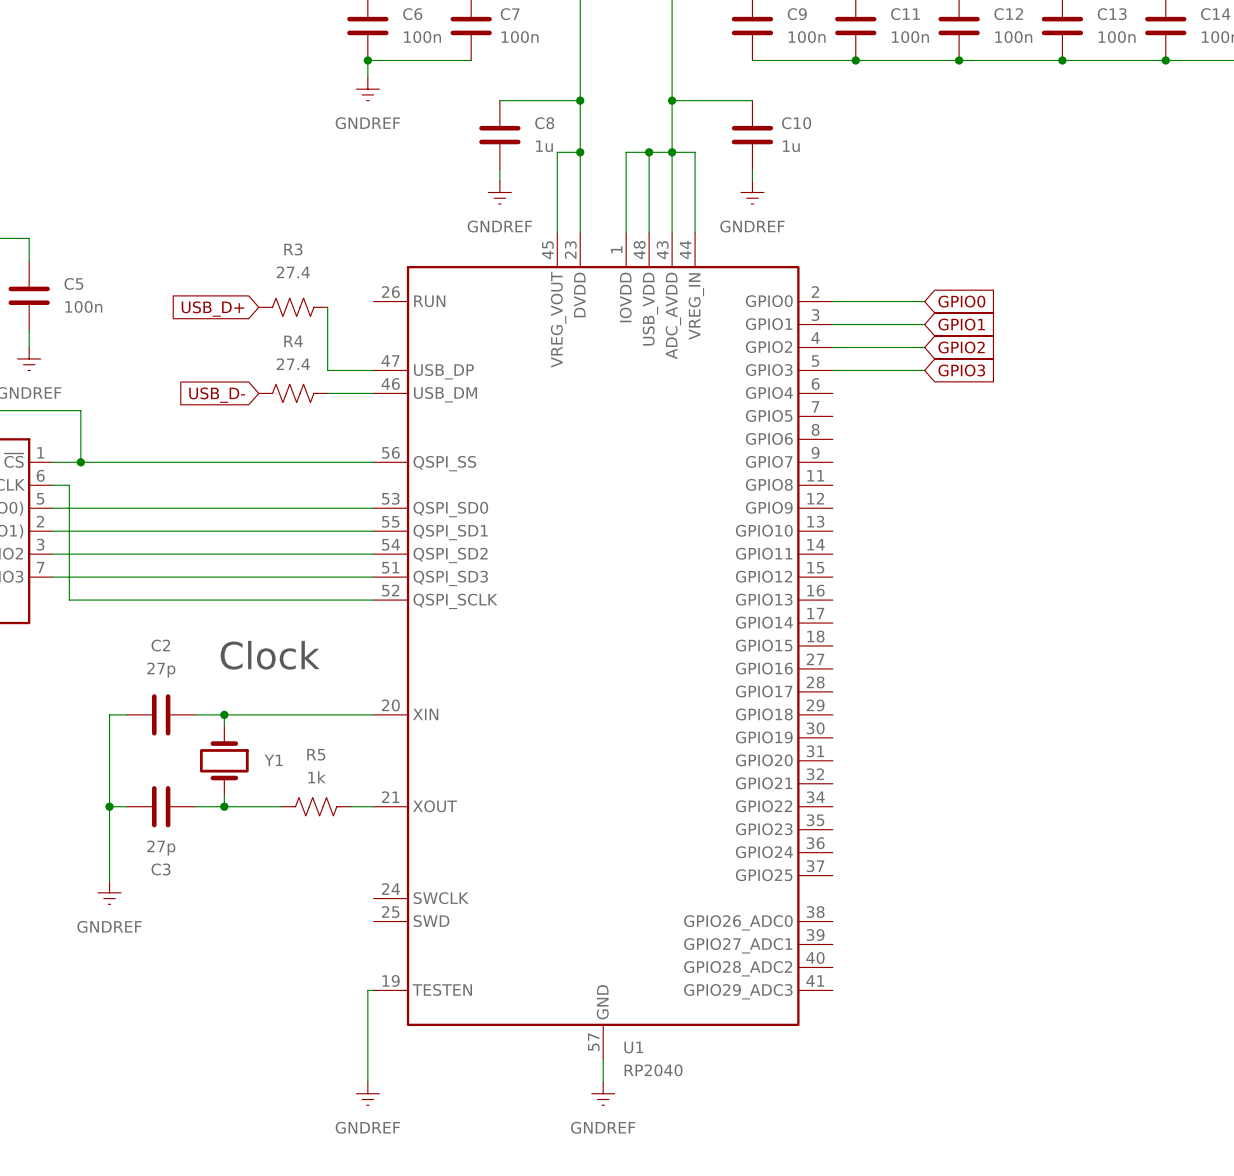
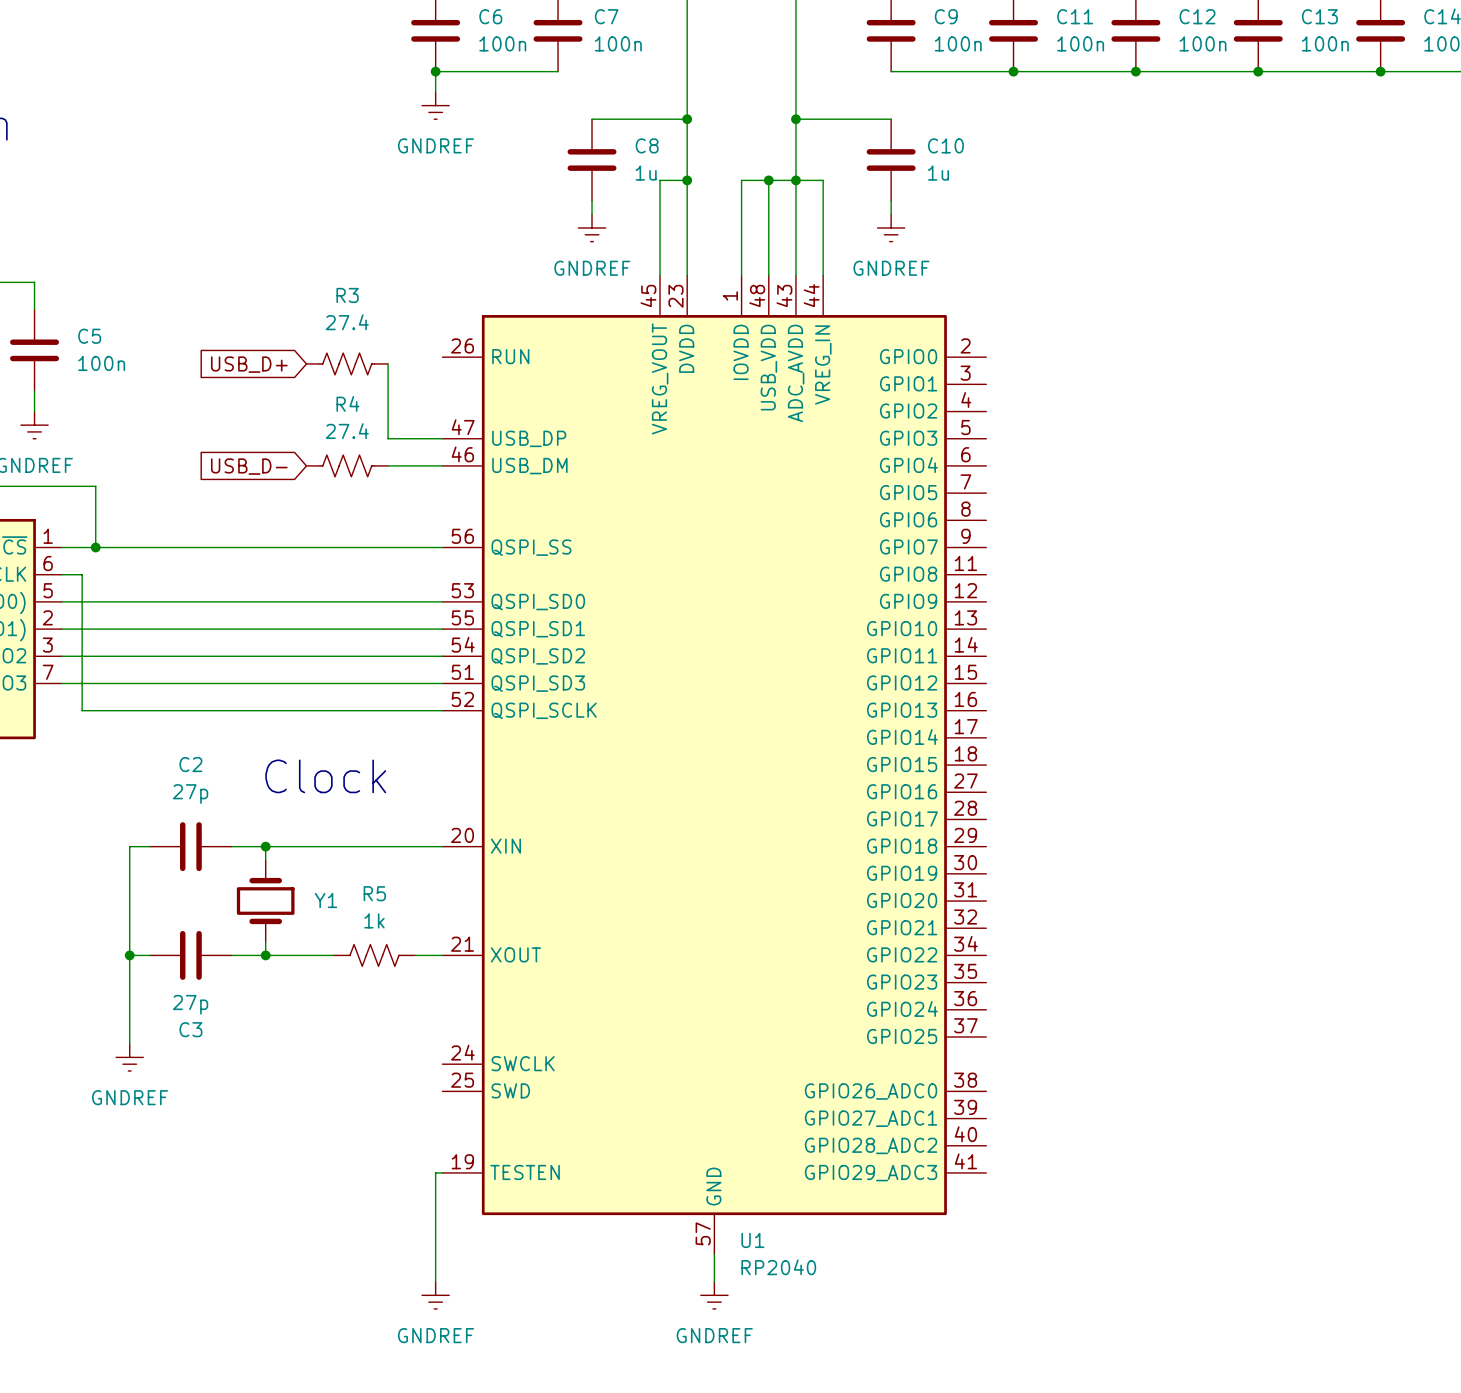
wire: (832, 301) (924, 301) -> none
global label: GPIO0 (961, 301) -> none
wire: (832, 324) (924, 324) -> none
global label: GPIO1 (961, 324) -> none
wire: (832, 347) (924, 347) -> none
global label: GPIO2 (961, 347) -> none
wire: (832, 370) (924, 370) -> none
global label: GPIO3 (961, 370) -> none

